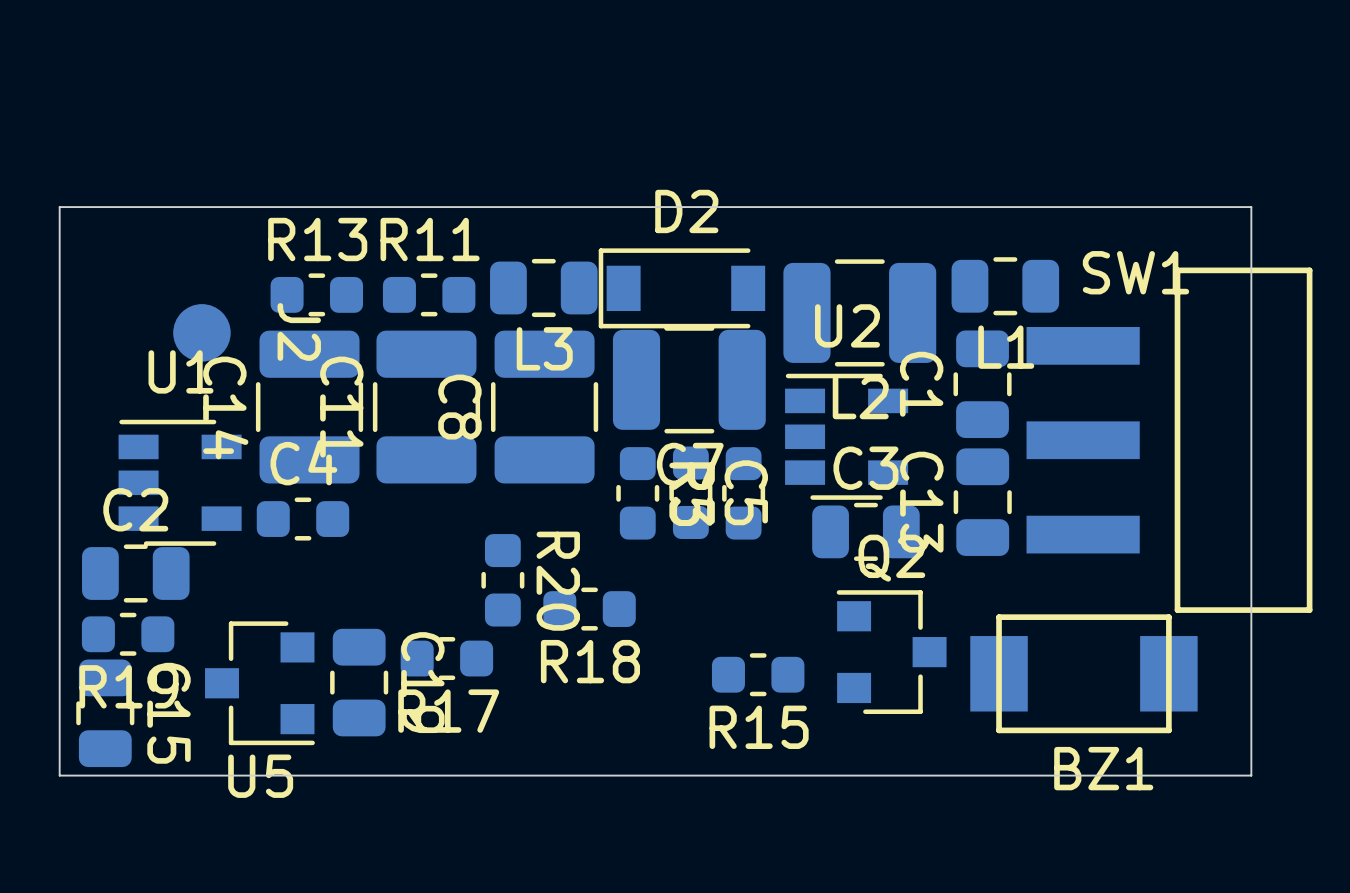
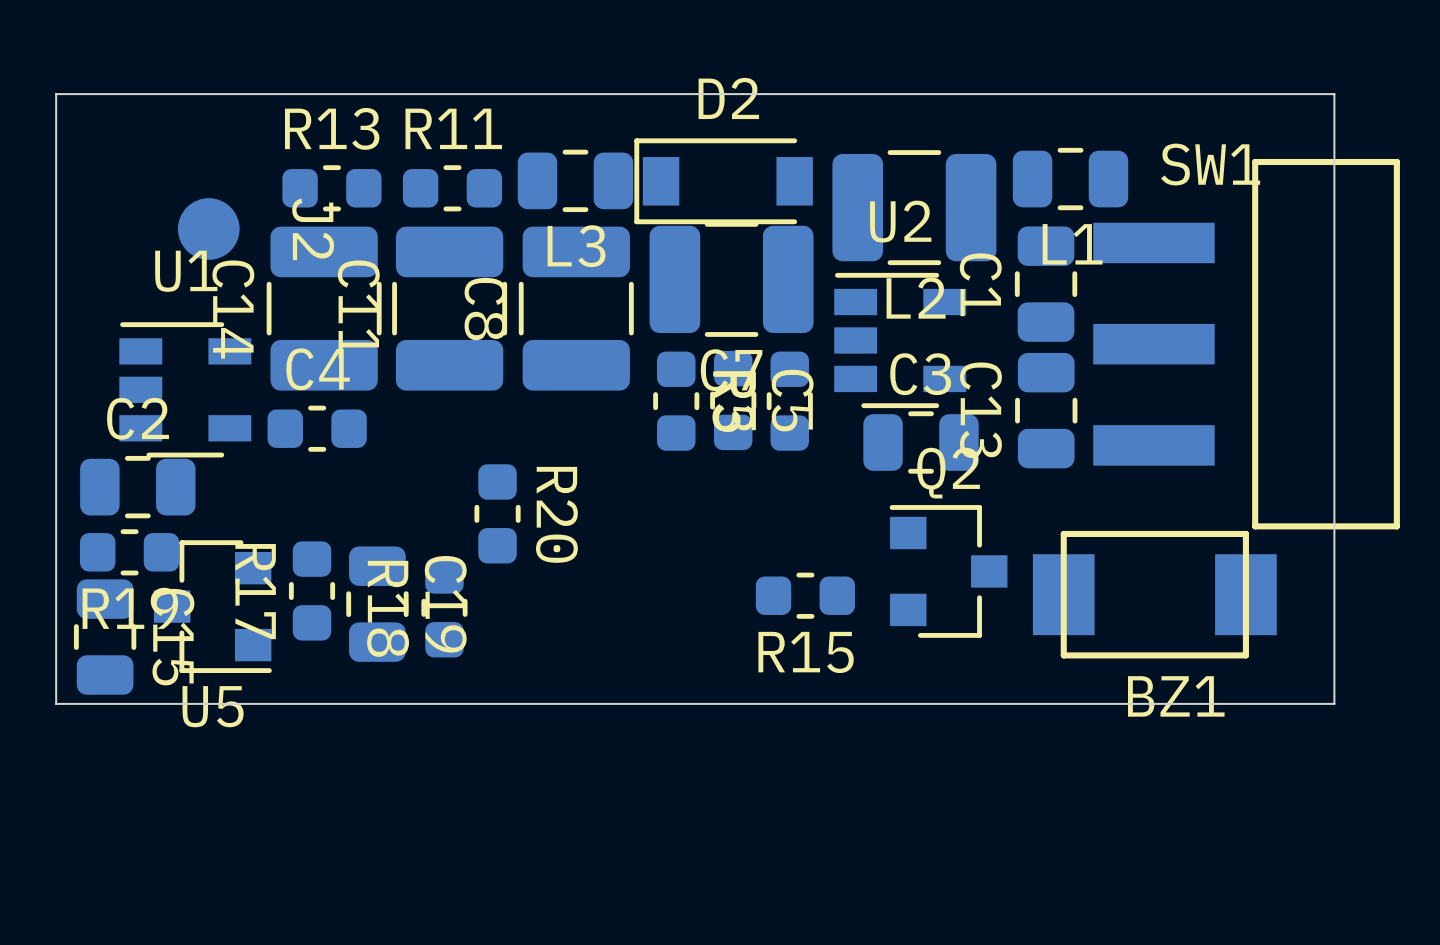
R20 position: (502, 580) -> (497, 513)
R18 rotation: 0° (589, 609) -> 90° clockwise (444, 607)
R18 position: (589, 609) -> (444, 607)
R17 rotation: 0° (446, 658) -> 90° clockwise (312, 590)
R17 position: (446, 658) -> (312, 590)
U5 position: (259, 683) -> (212, 606)

